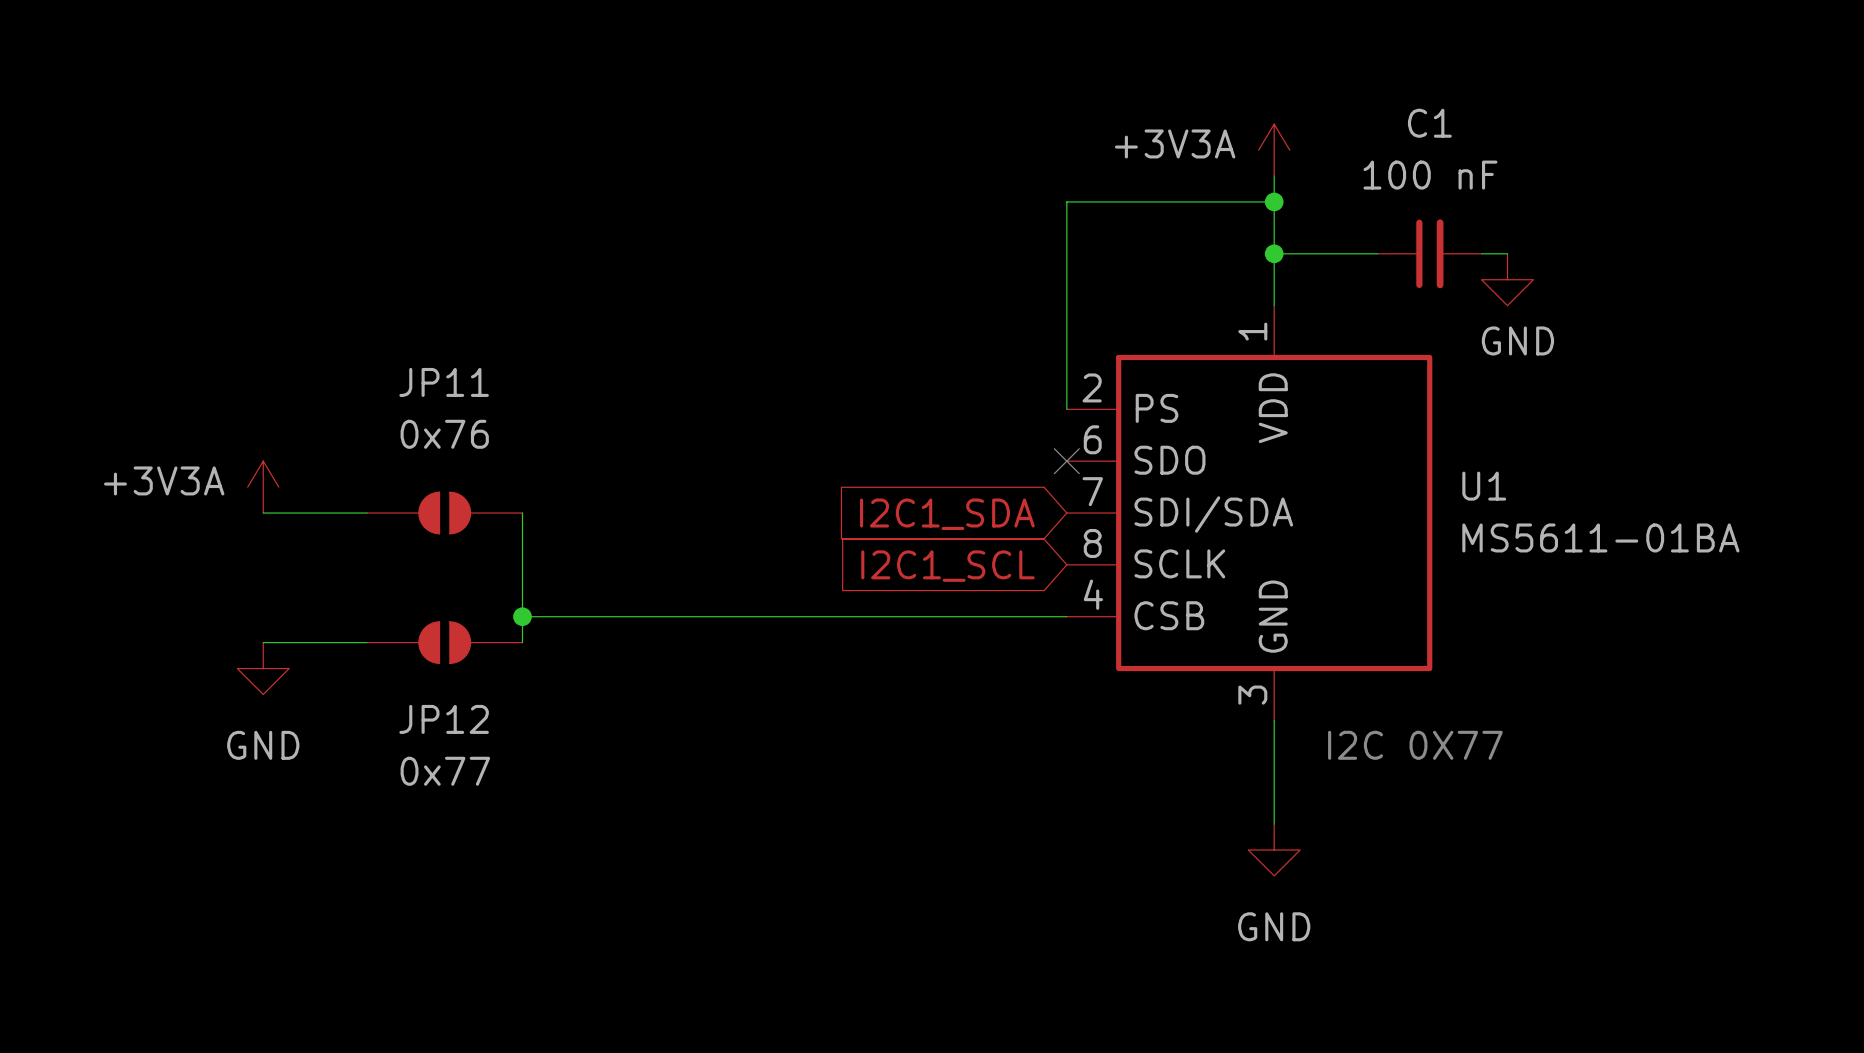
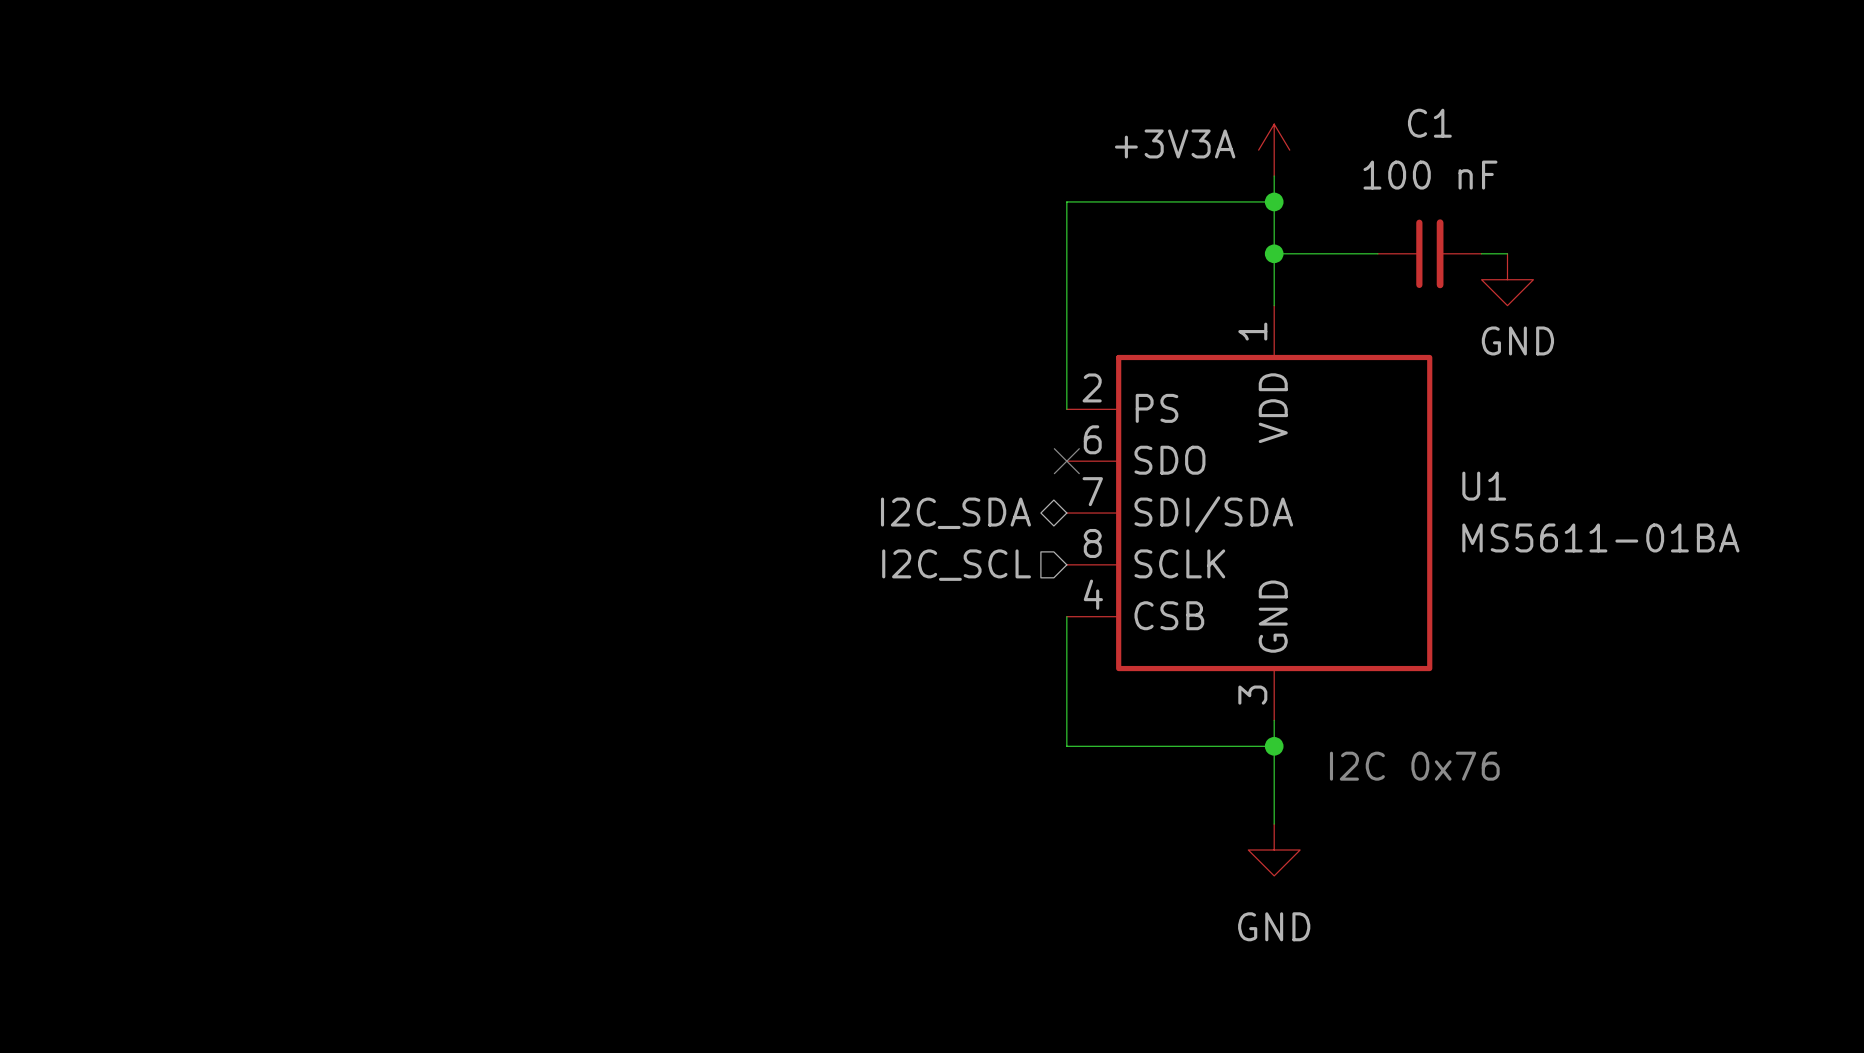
power symbol: +3V3A (263, 487) -> none
wire: (263, 513) (366, 513) -> none
JP11: 0x76 (444, 513) -> none
wire: (522, 513) (522, 642) -> none
hierarchical label: none -> I2C_SDA (955, 513)
global label: I2C1_SDA (947, 514) -> none
hierarchical label: none -> I2C_SCL (956, 565)
global label: I2C1_SCL (947, 566) -> none
wire: (522, 616) (1066, 616) -> (1274, 746) (1066, 746) (1066, 616)
junction: (522, 616) -> none
wire: (263, 642) (366, 642) -> none
JP12: 0x77 (444, 642) -> none
power symbol: GND (263, 668) -> none
text: I2C 0X77 (1415, 745) -> I2C 0x76 (1414, 766)
junction: none -> (1274, 746)

